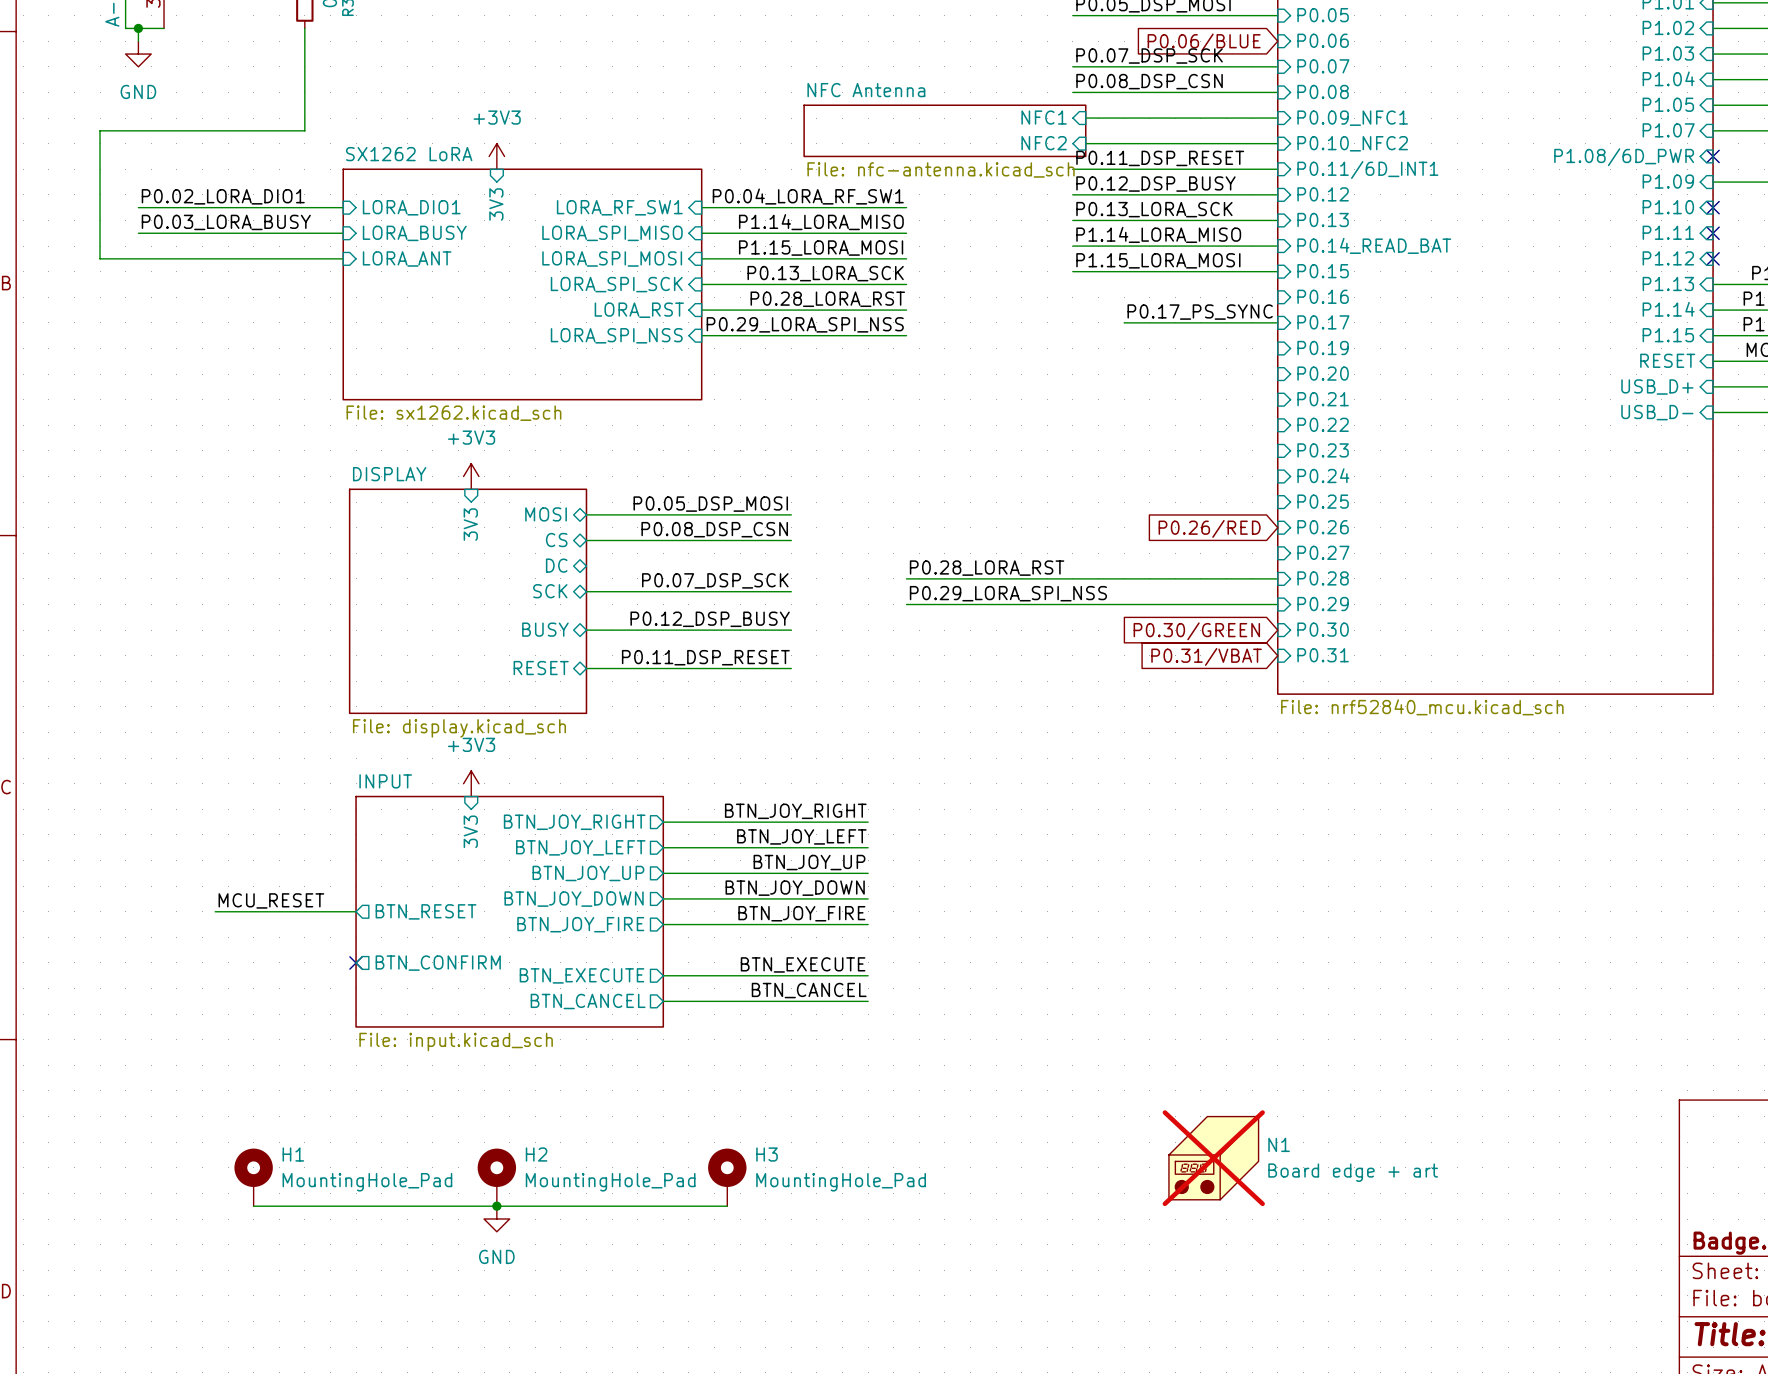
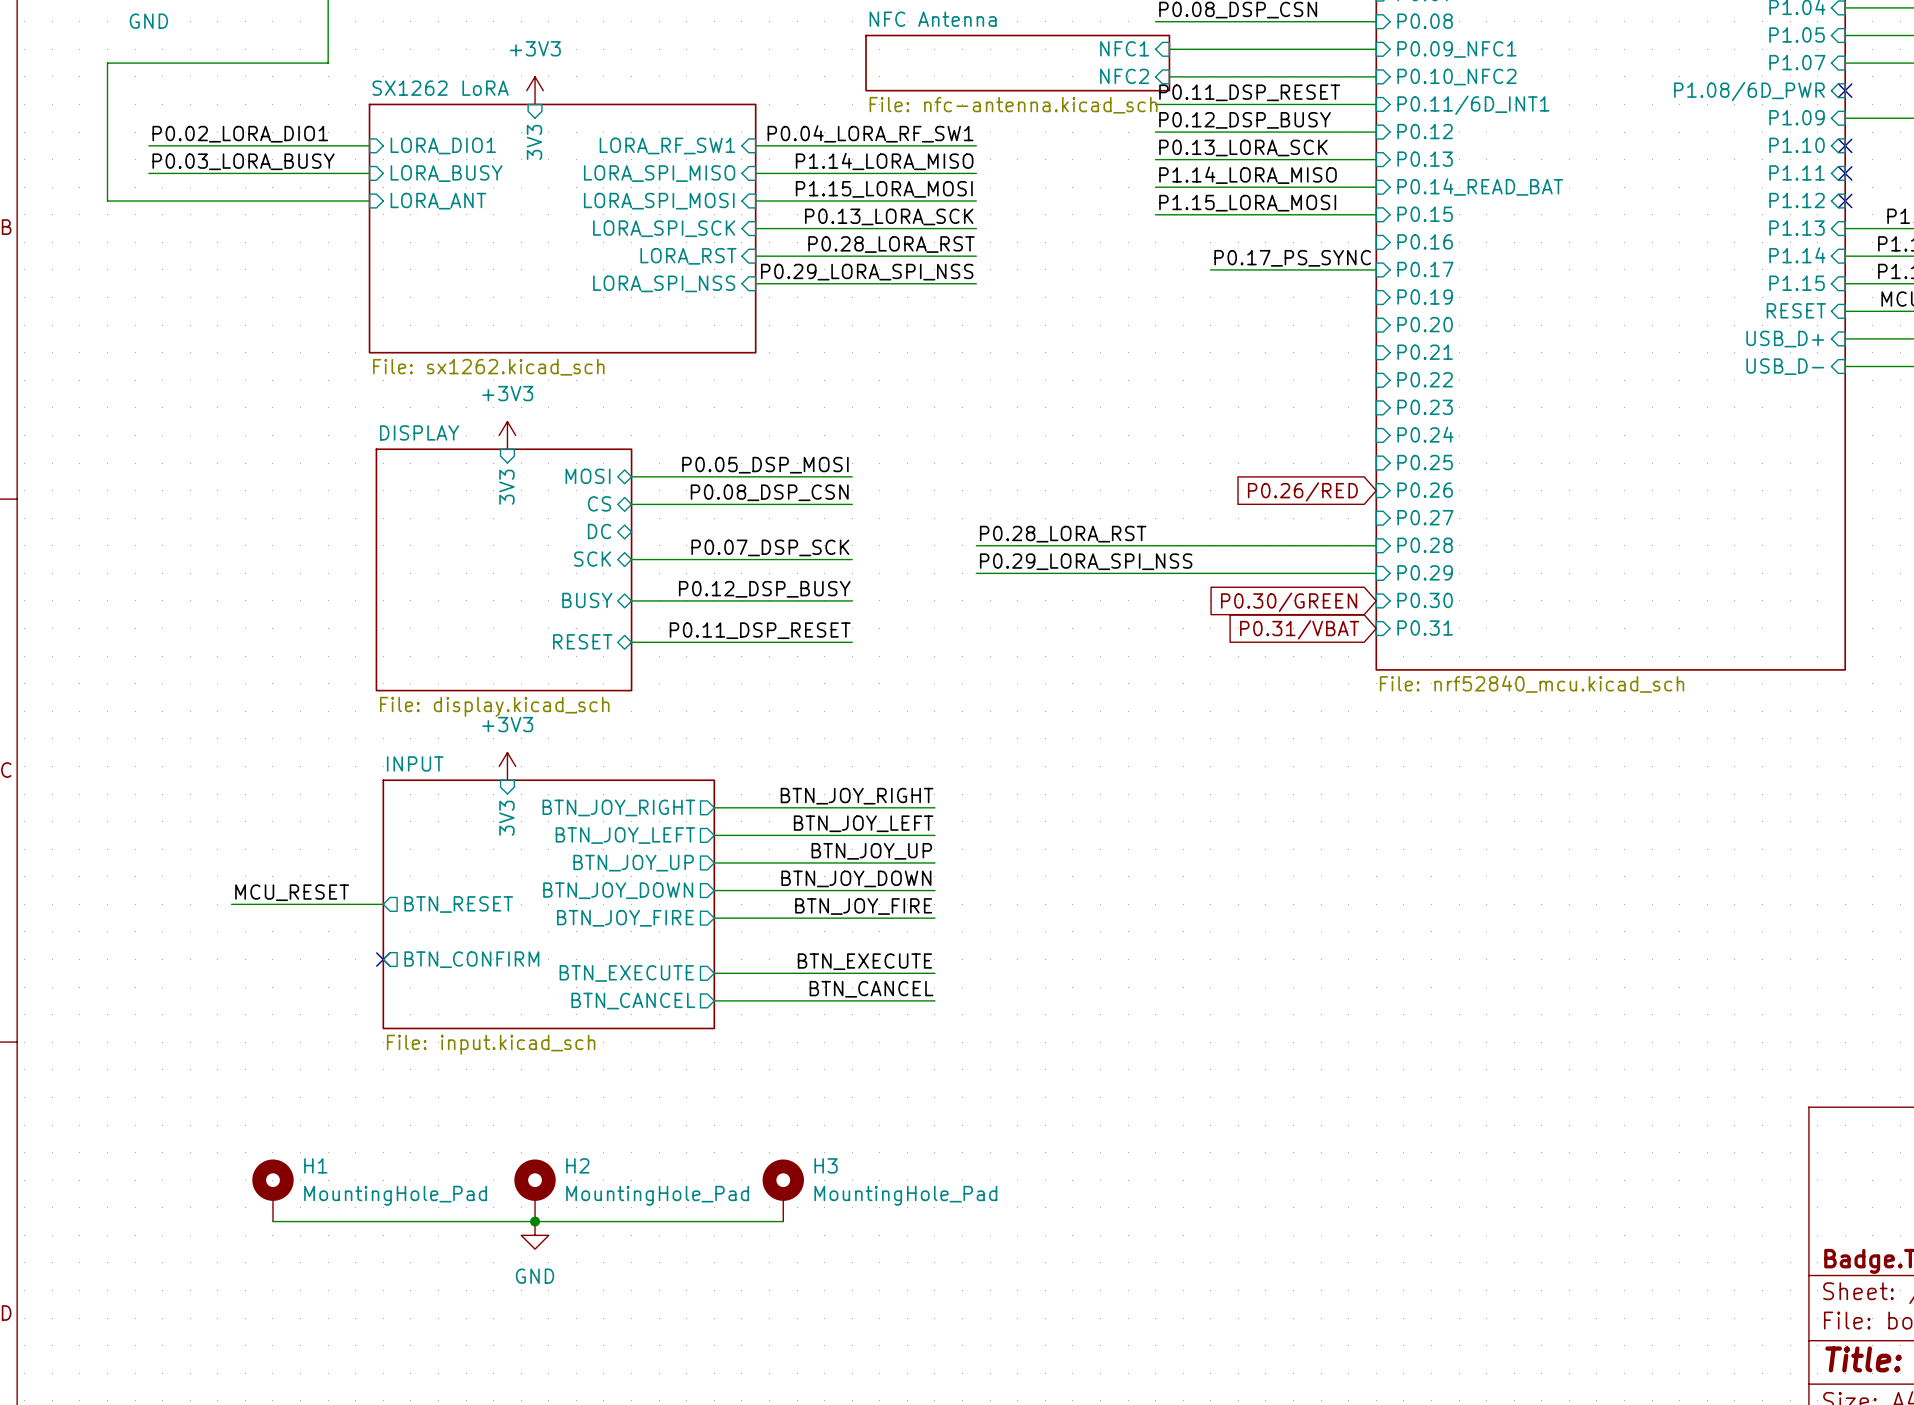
N1: Board edge + art (1213, 1158) -> none

